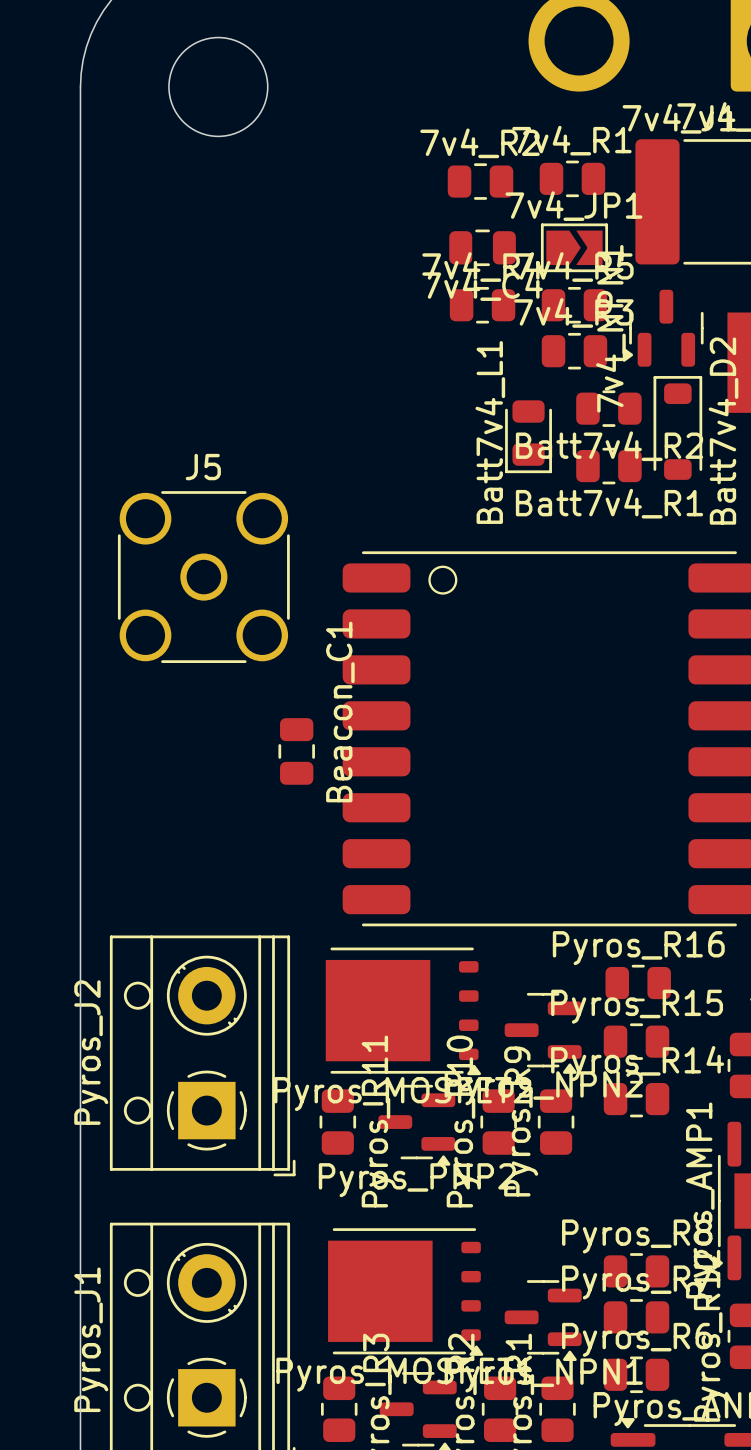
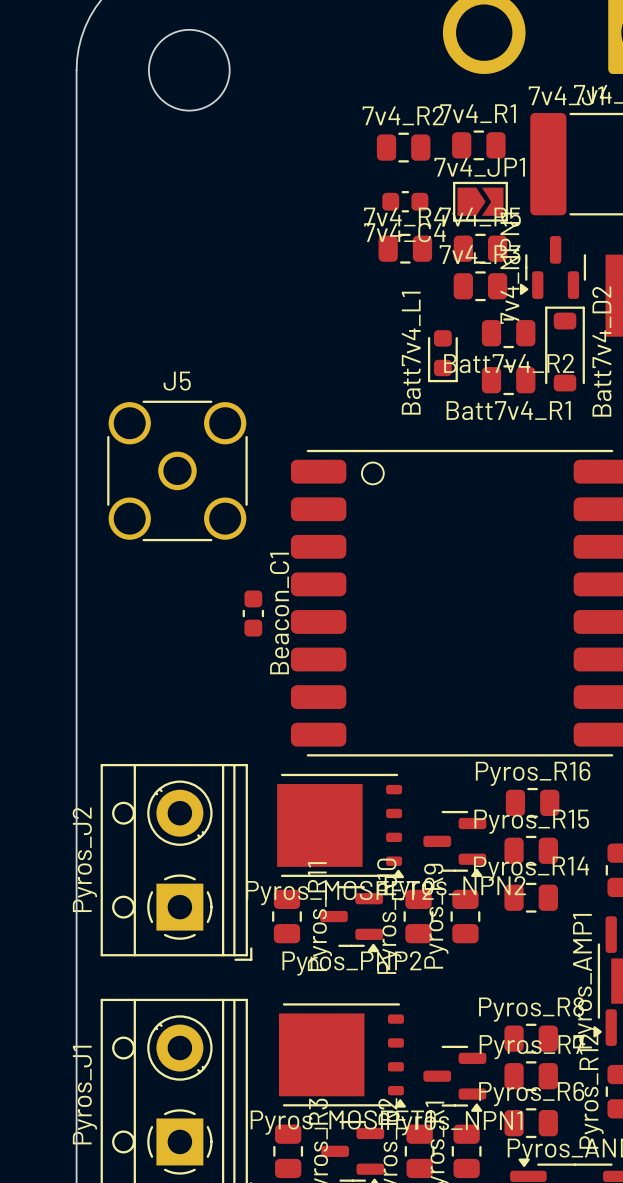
7v4_C4 footprint: [449, 229, 516, 267] -> [382, 191, 429, 213]
Batt7v4_L1 footprint: [505, 400, 552, 474] -> [427, 330, 458, 383]
Beacon_C1 name position: Beacon_C1 (340, 712) -> Beacon_C1 (279, 613)
Beacon_C1 footprint: [278, 718, 315, 785] -> [242, 590, 265, 637]

